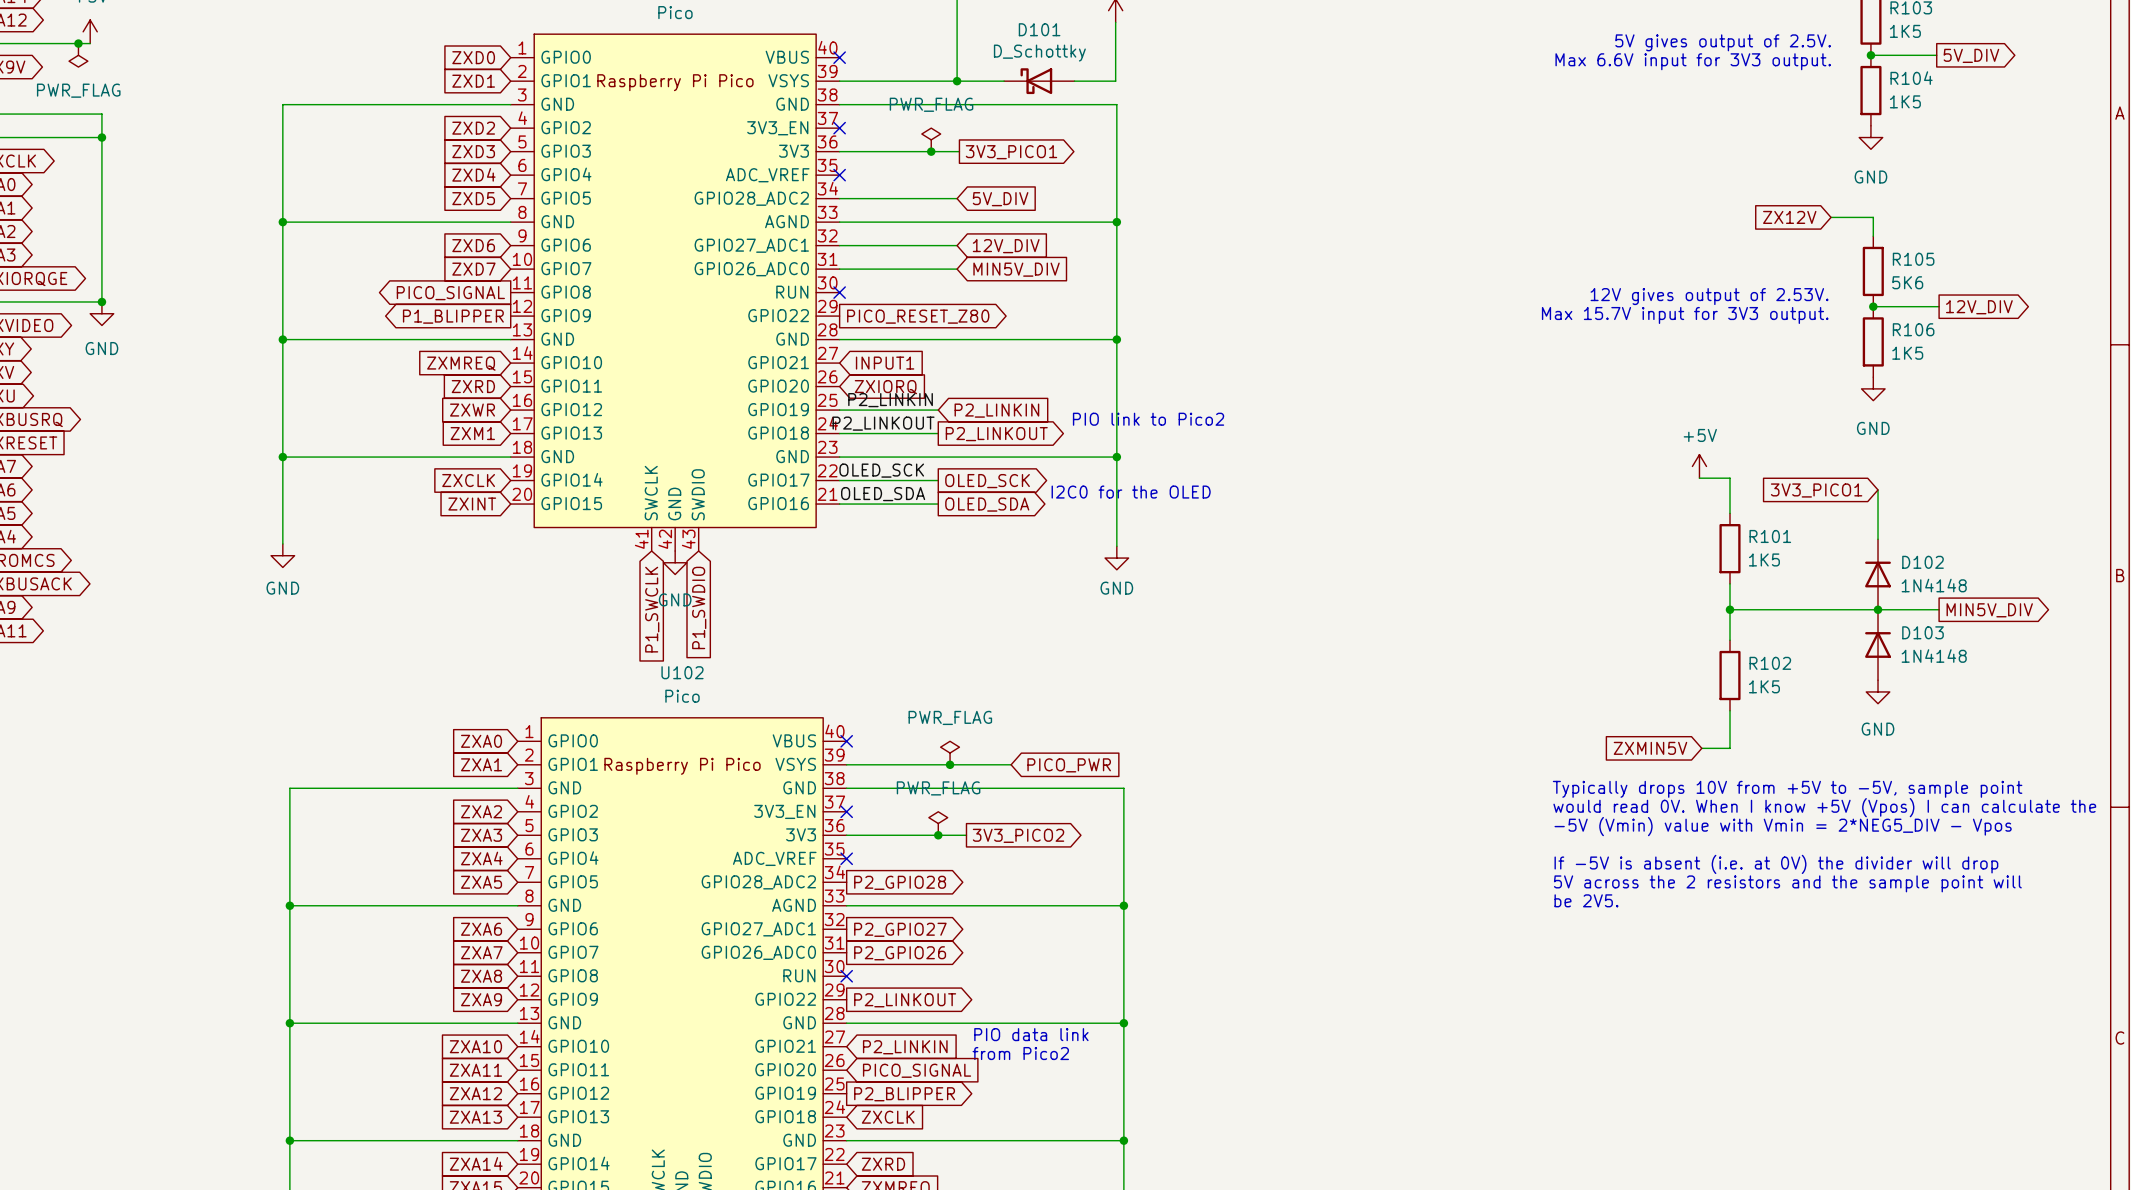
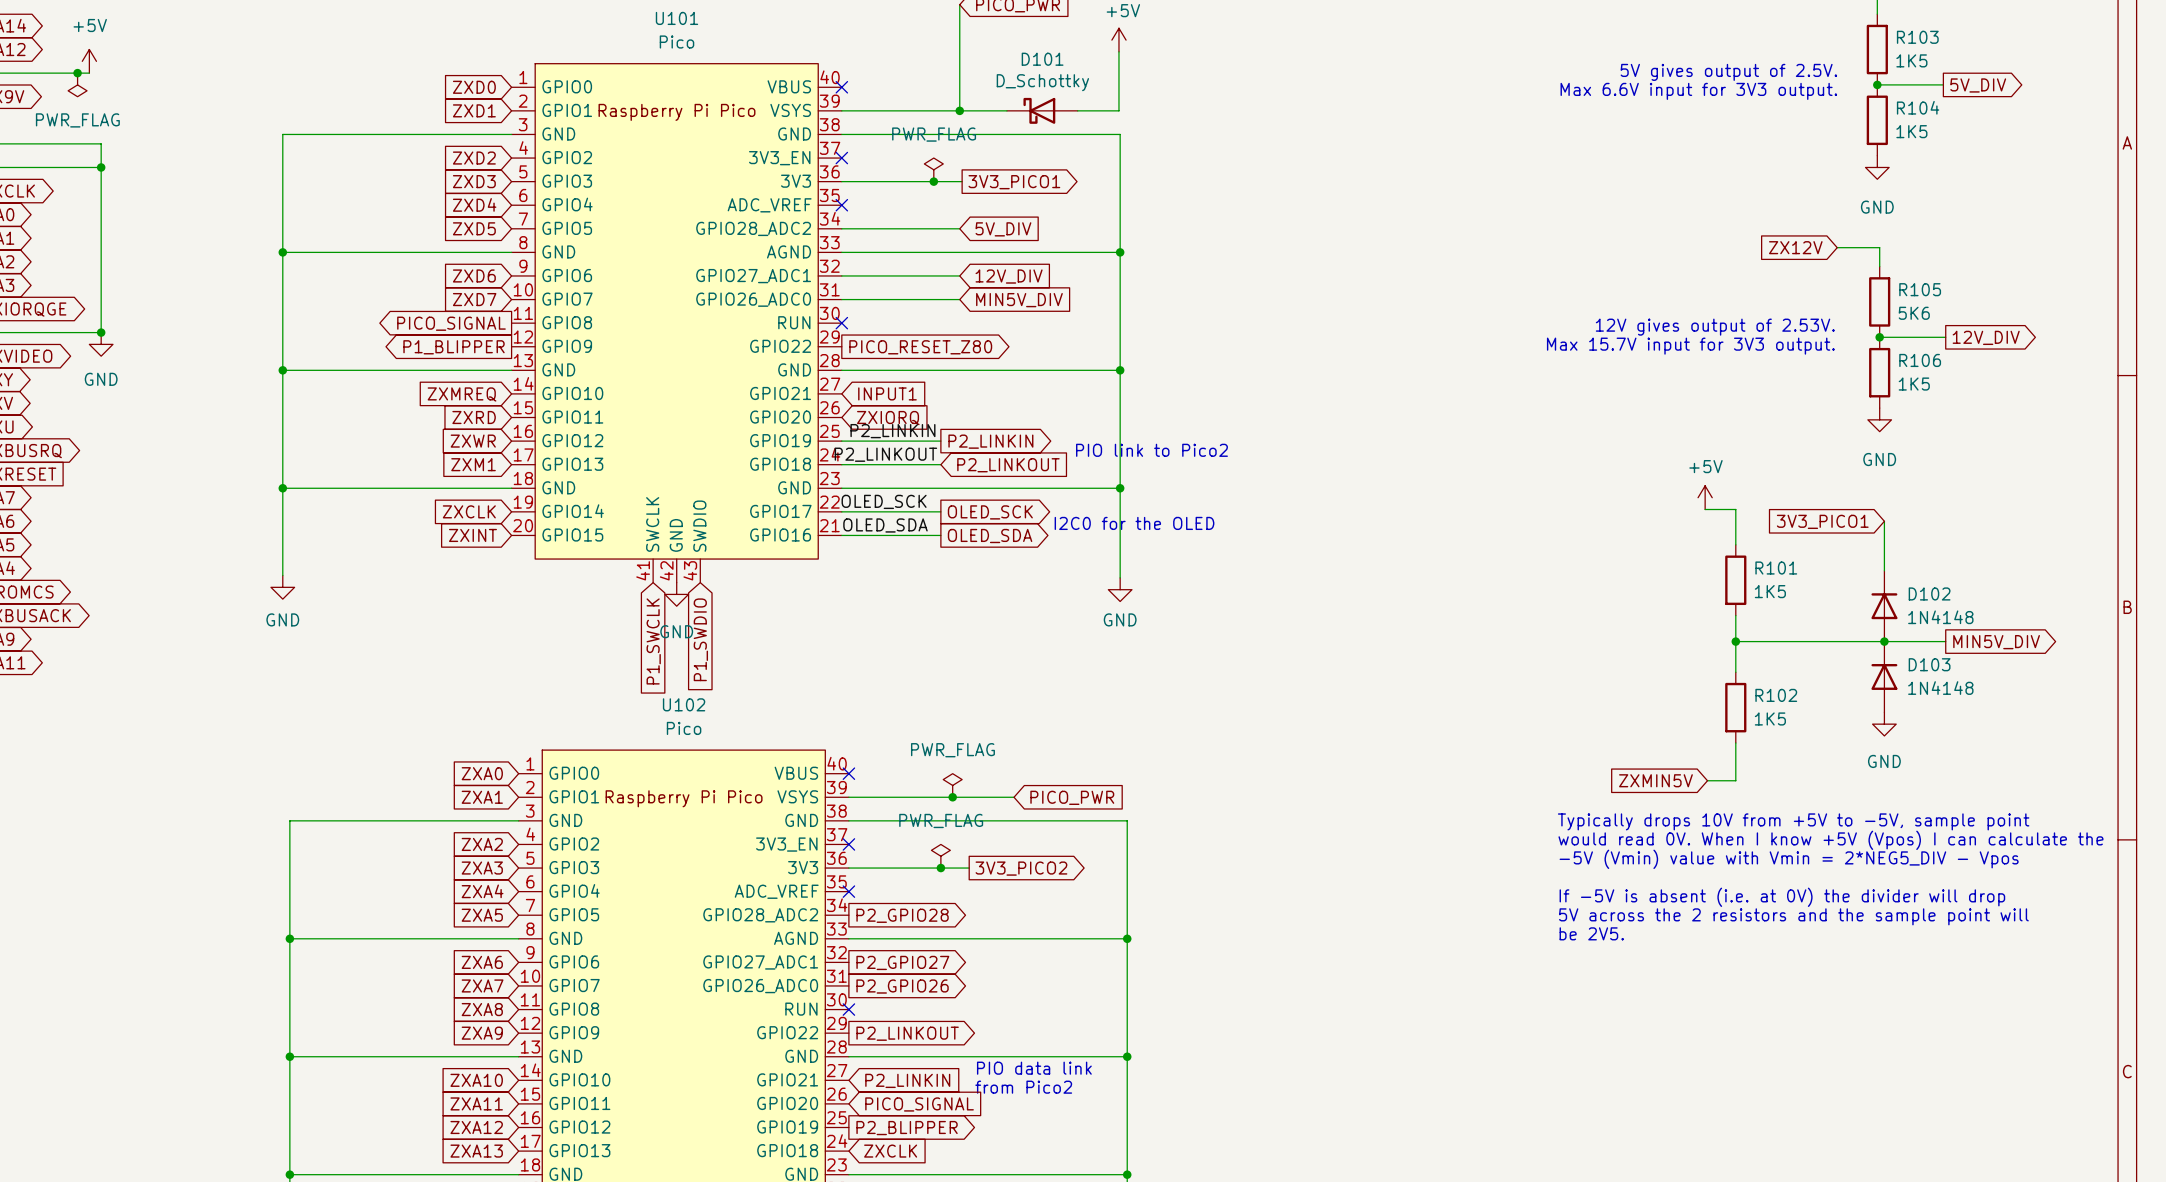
global label shape: input (996, 410) -> output (990, 441)
global label shape: output (996, 434) -> input (1008, 465)

